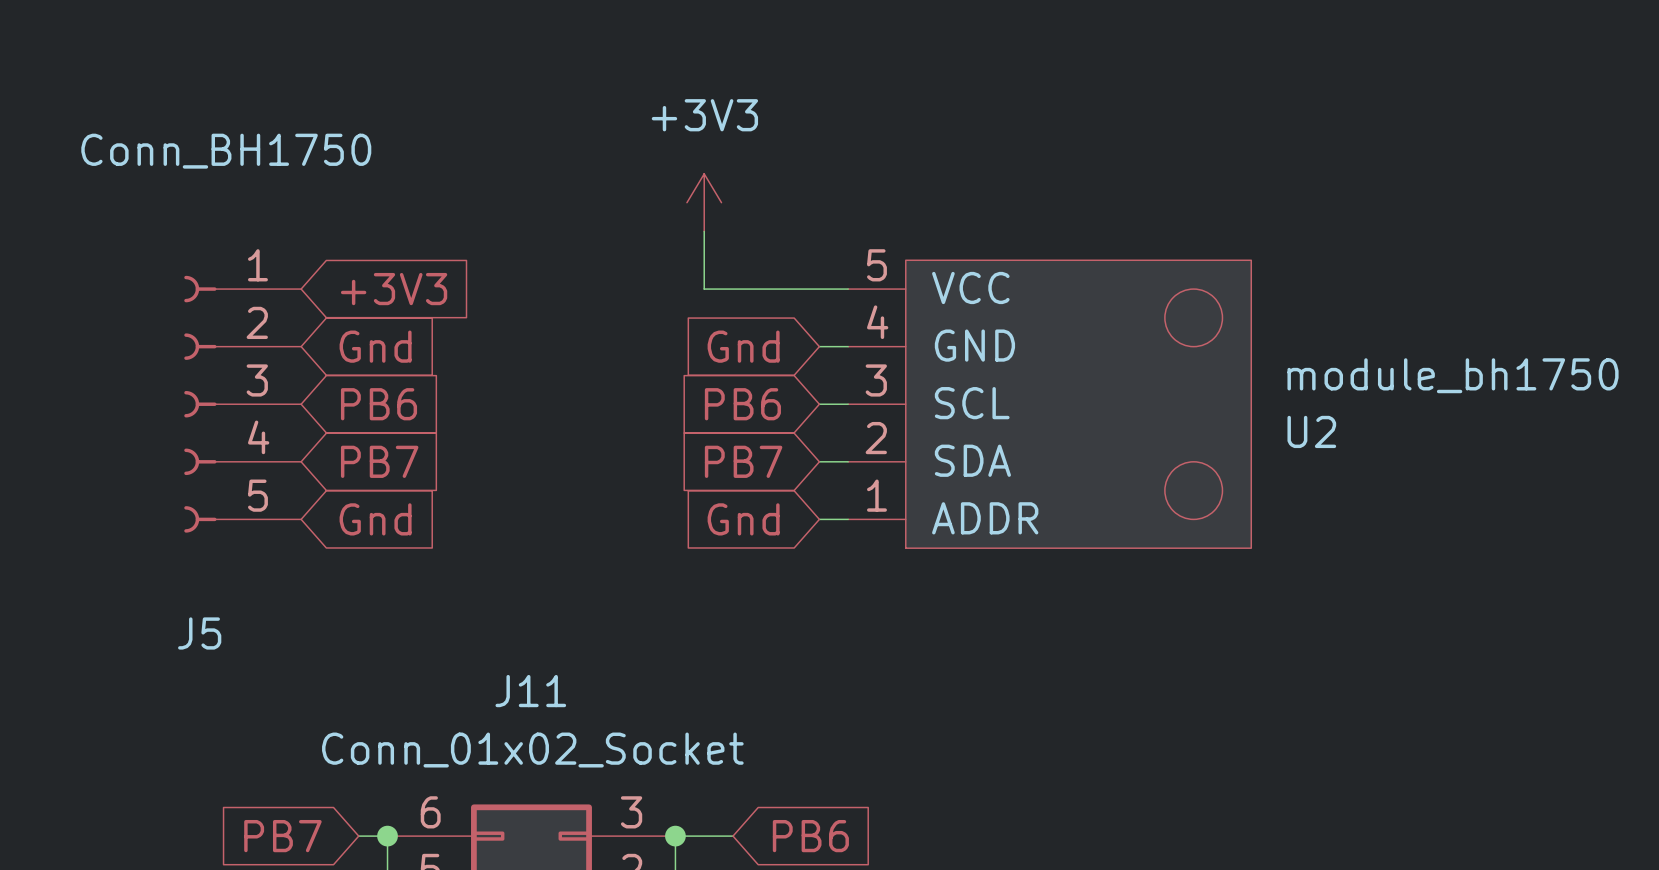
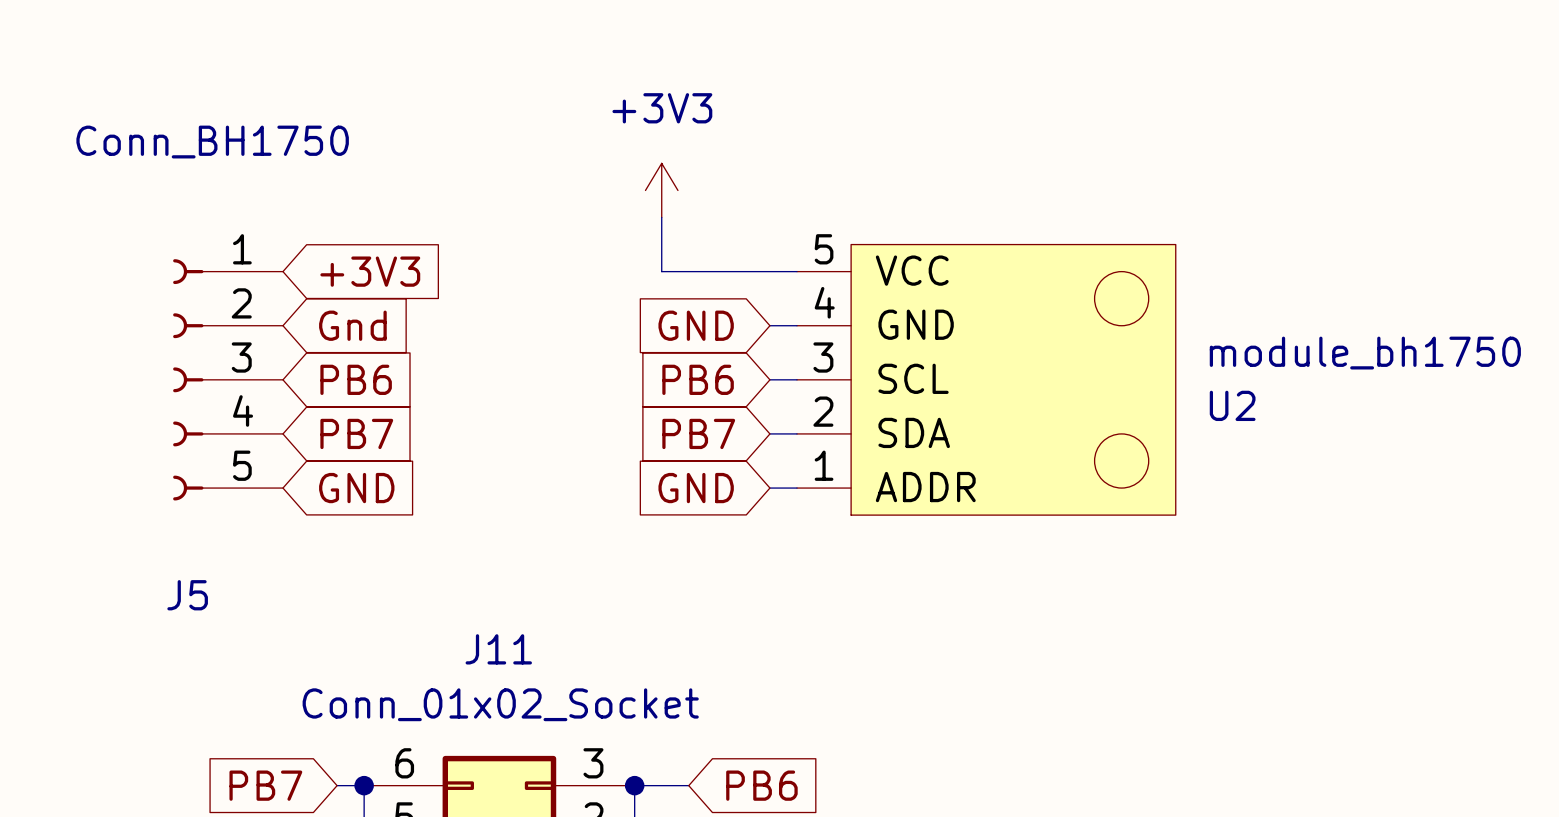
global label: Gnd (743, 346) -> GND (696, 325)
global label: Gnd (375, 519) -> GND (356, 488)
global label: Gnd (743, 519) -> GND (696, 488)

